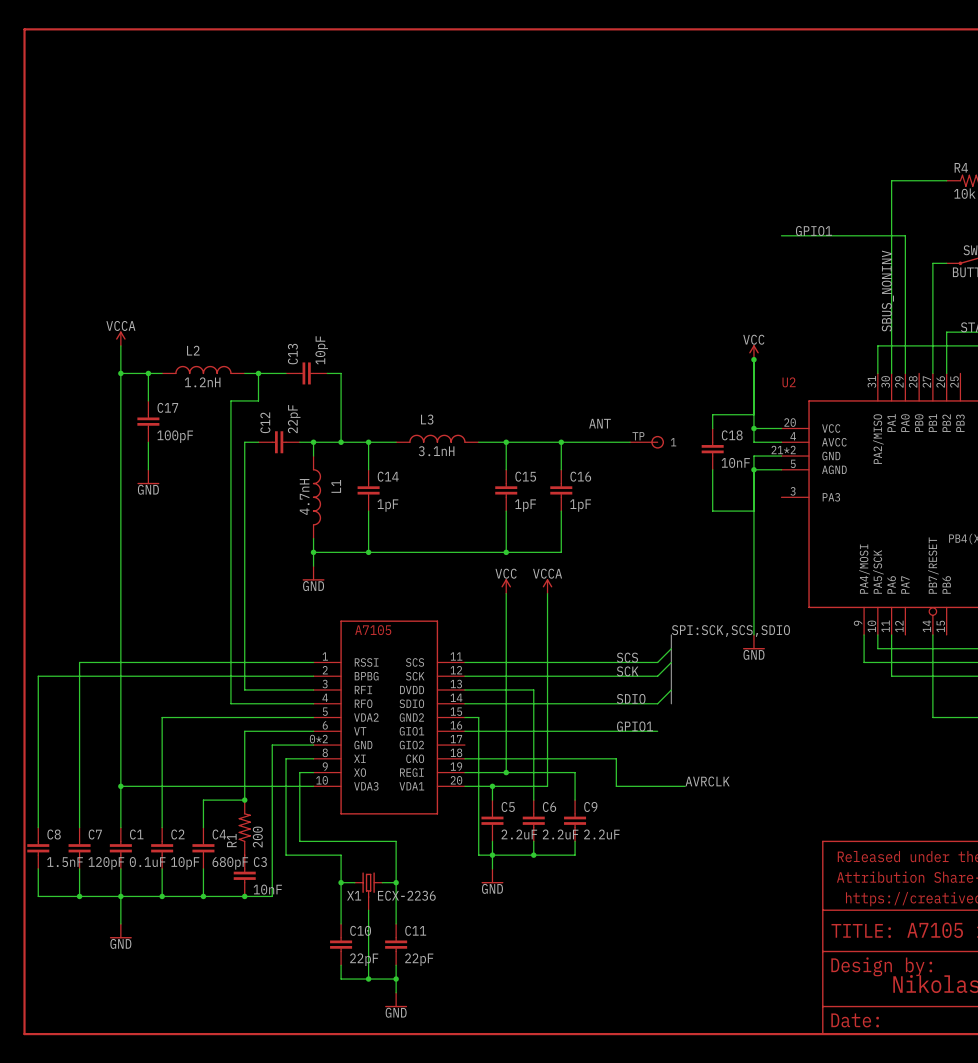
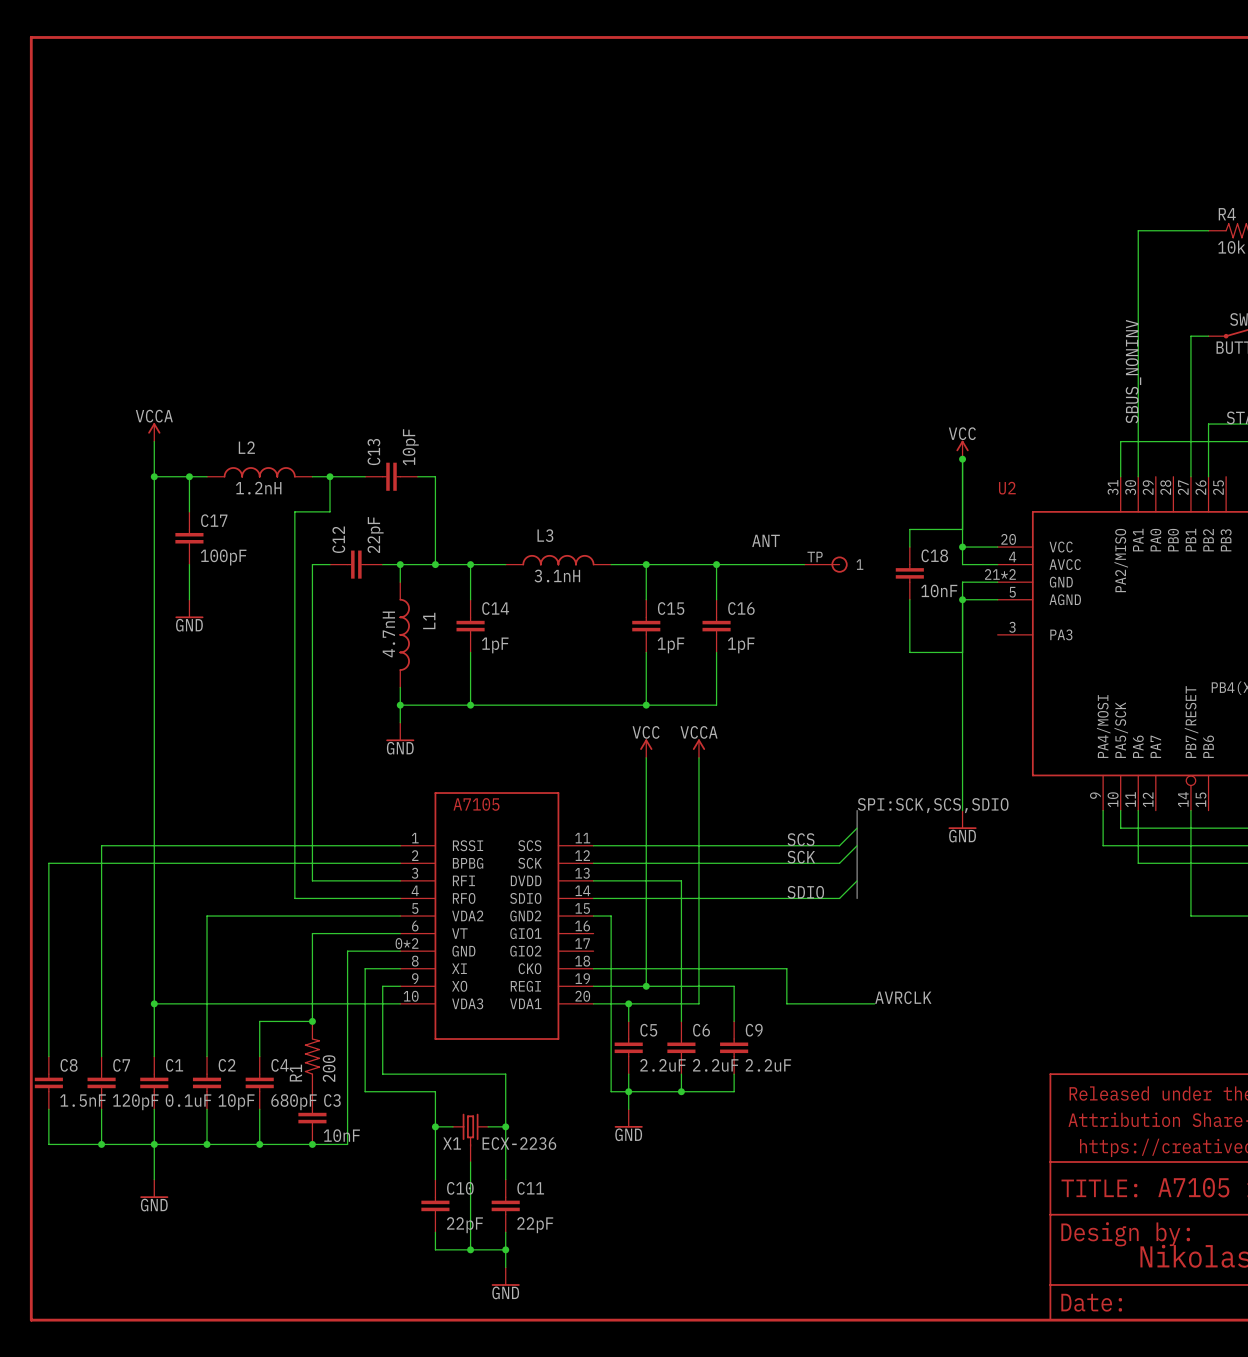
label: GPIO1 (813, 230) -> none
wire: (781, 235) (905, 235) (905, 373) -> none
label: GPIO1 (635, 726) -> none
wire: (464, 731) (657, 731) -> none

